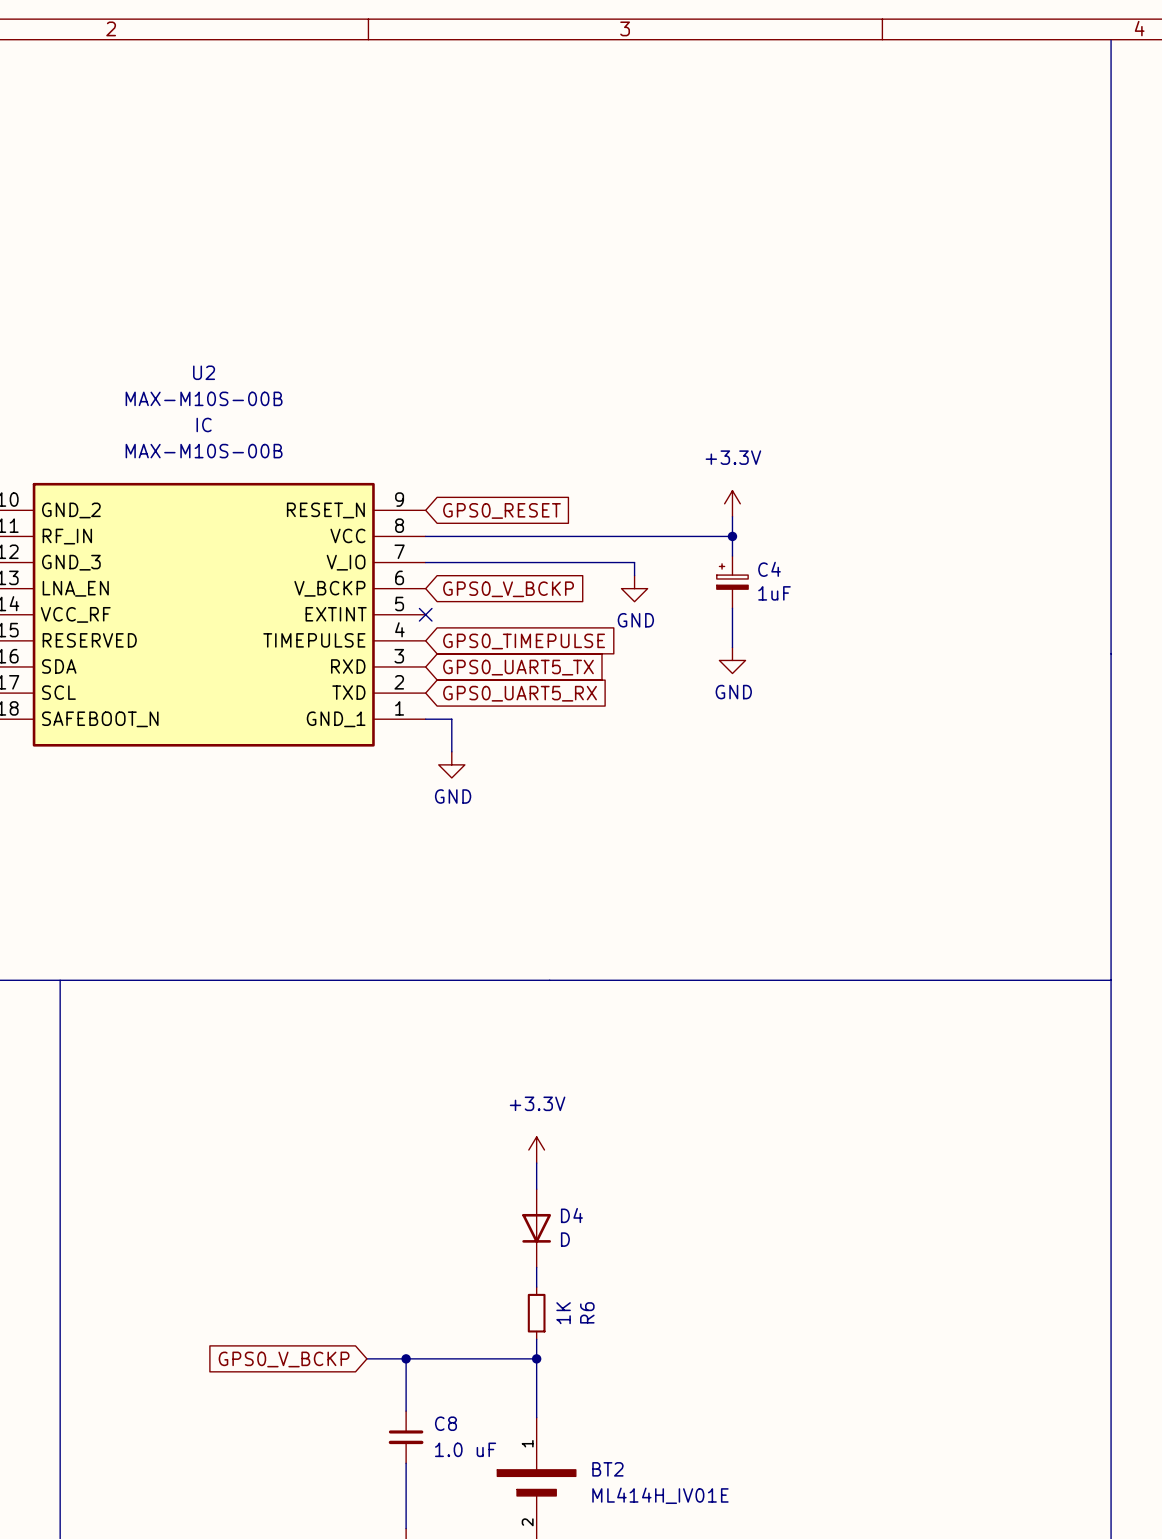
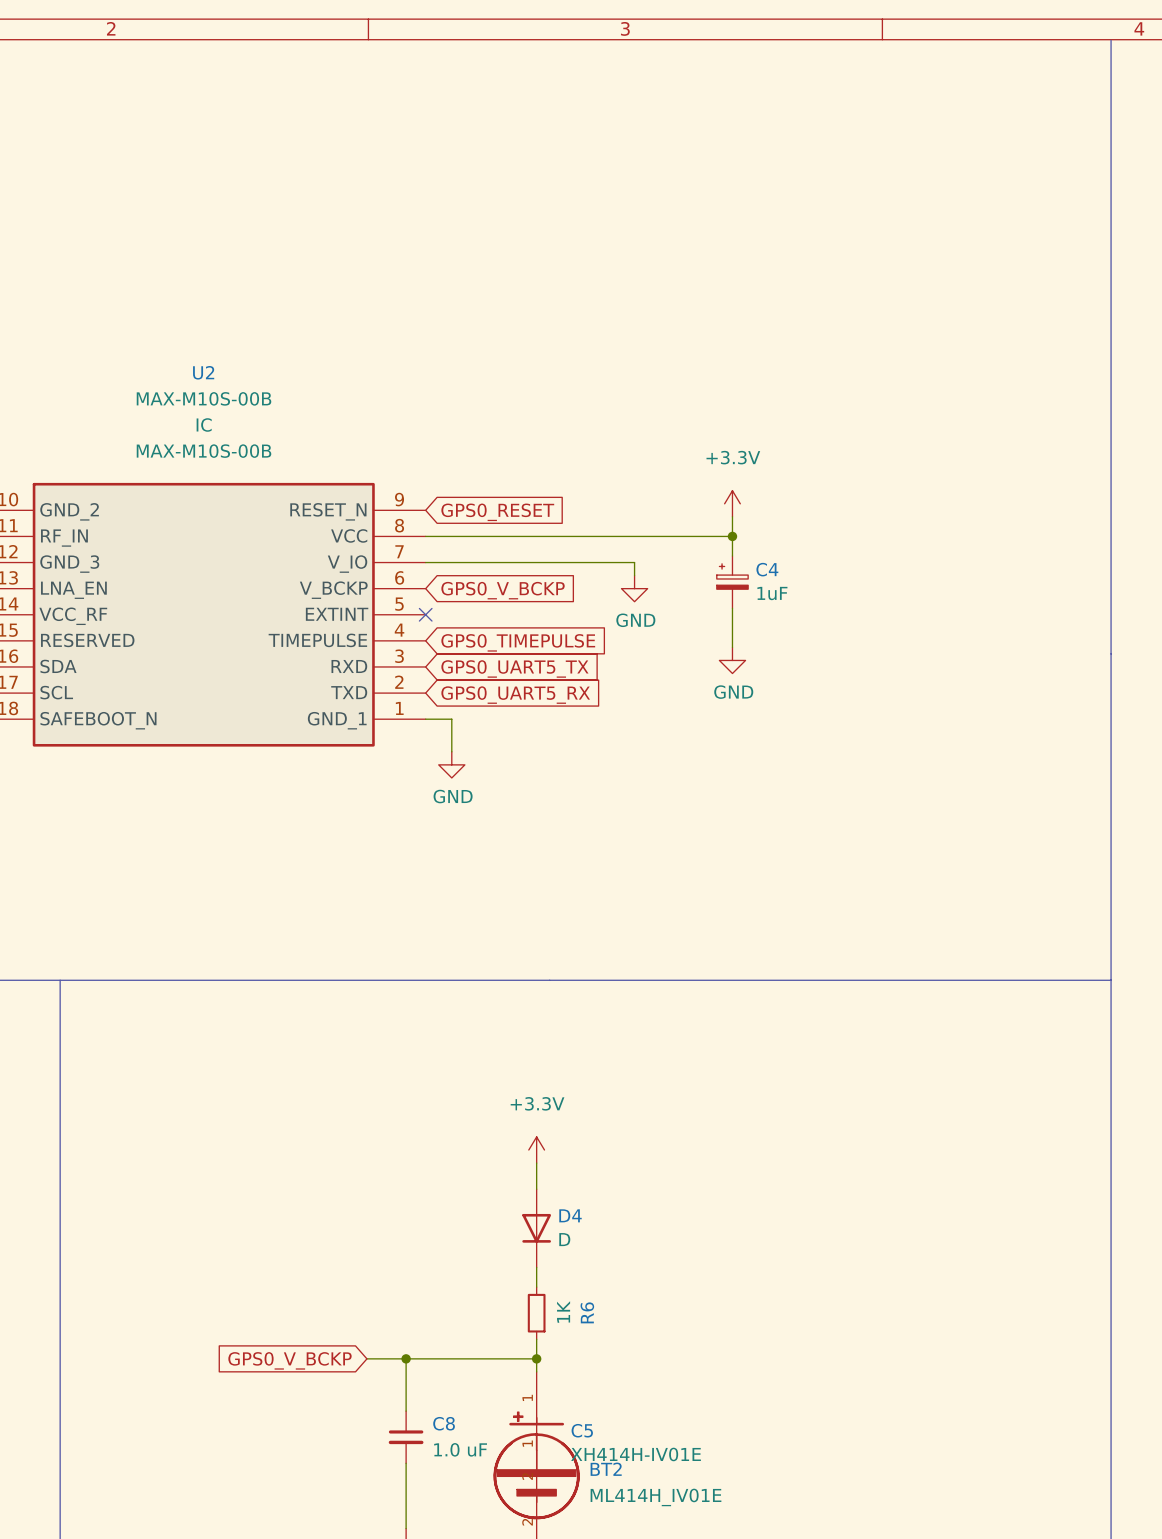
C5: none -> XH414H-IV01E (536, 1445)

